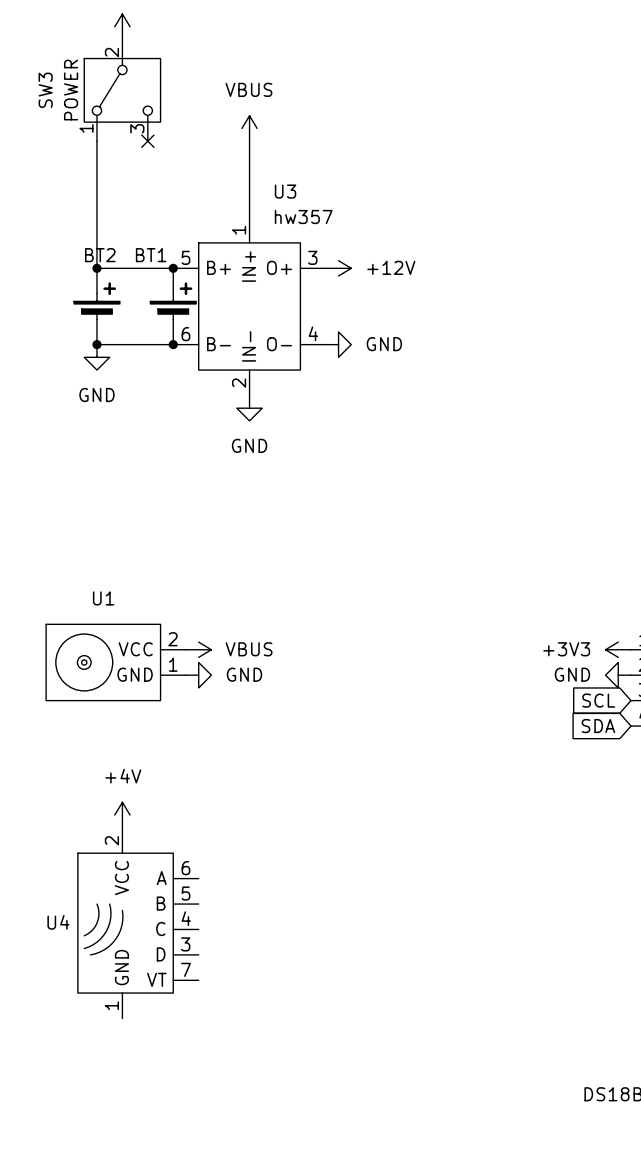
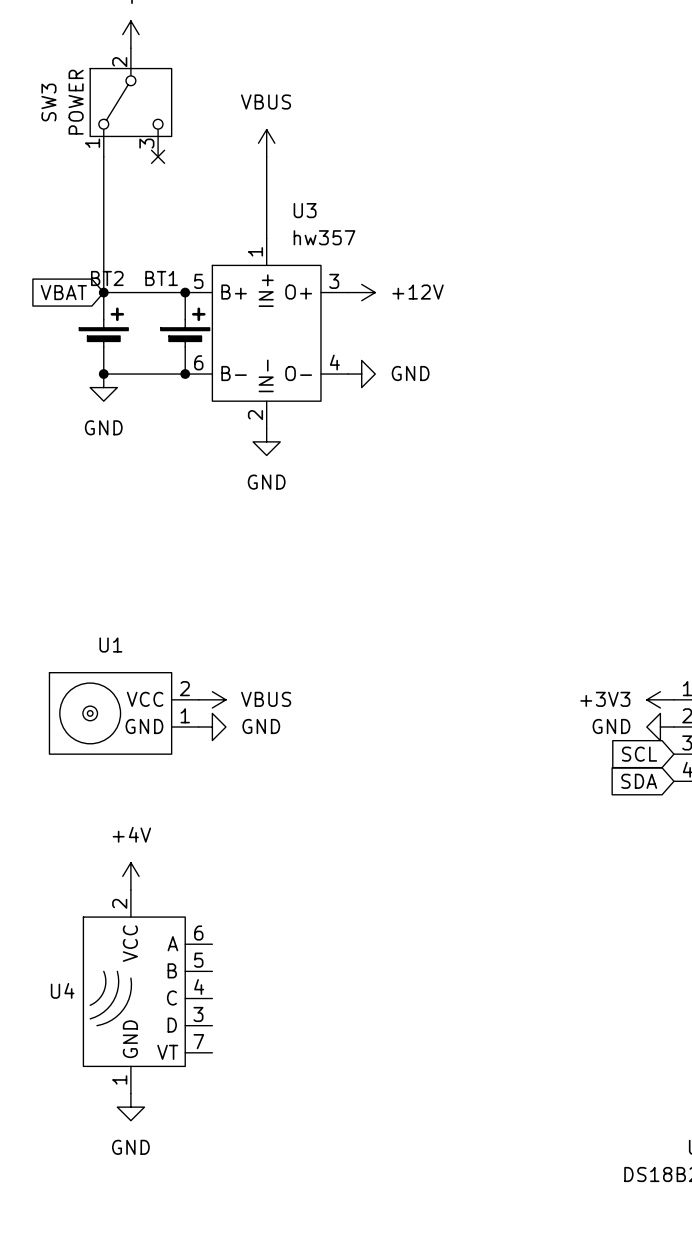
global label: none -> VBAT (63, 292)
power symbol: none -> GND (130, 1107)

